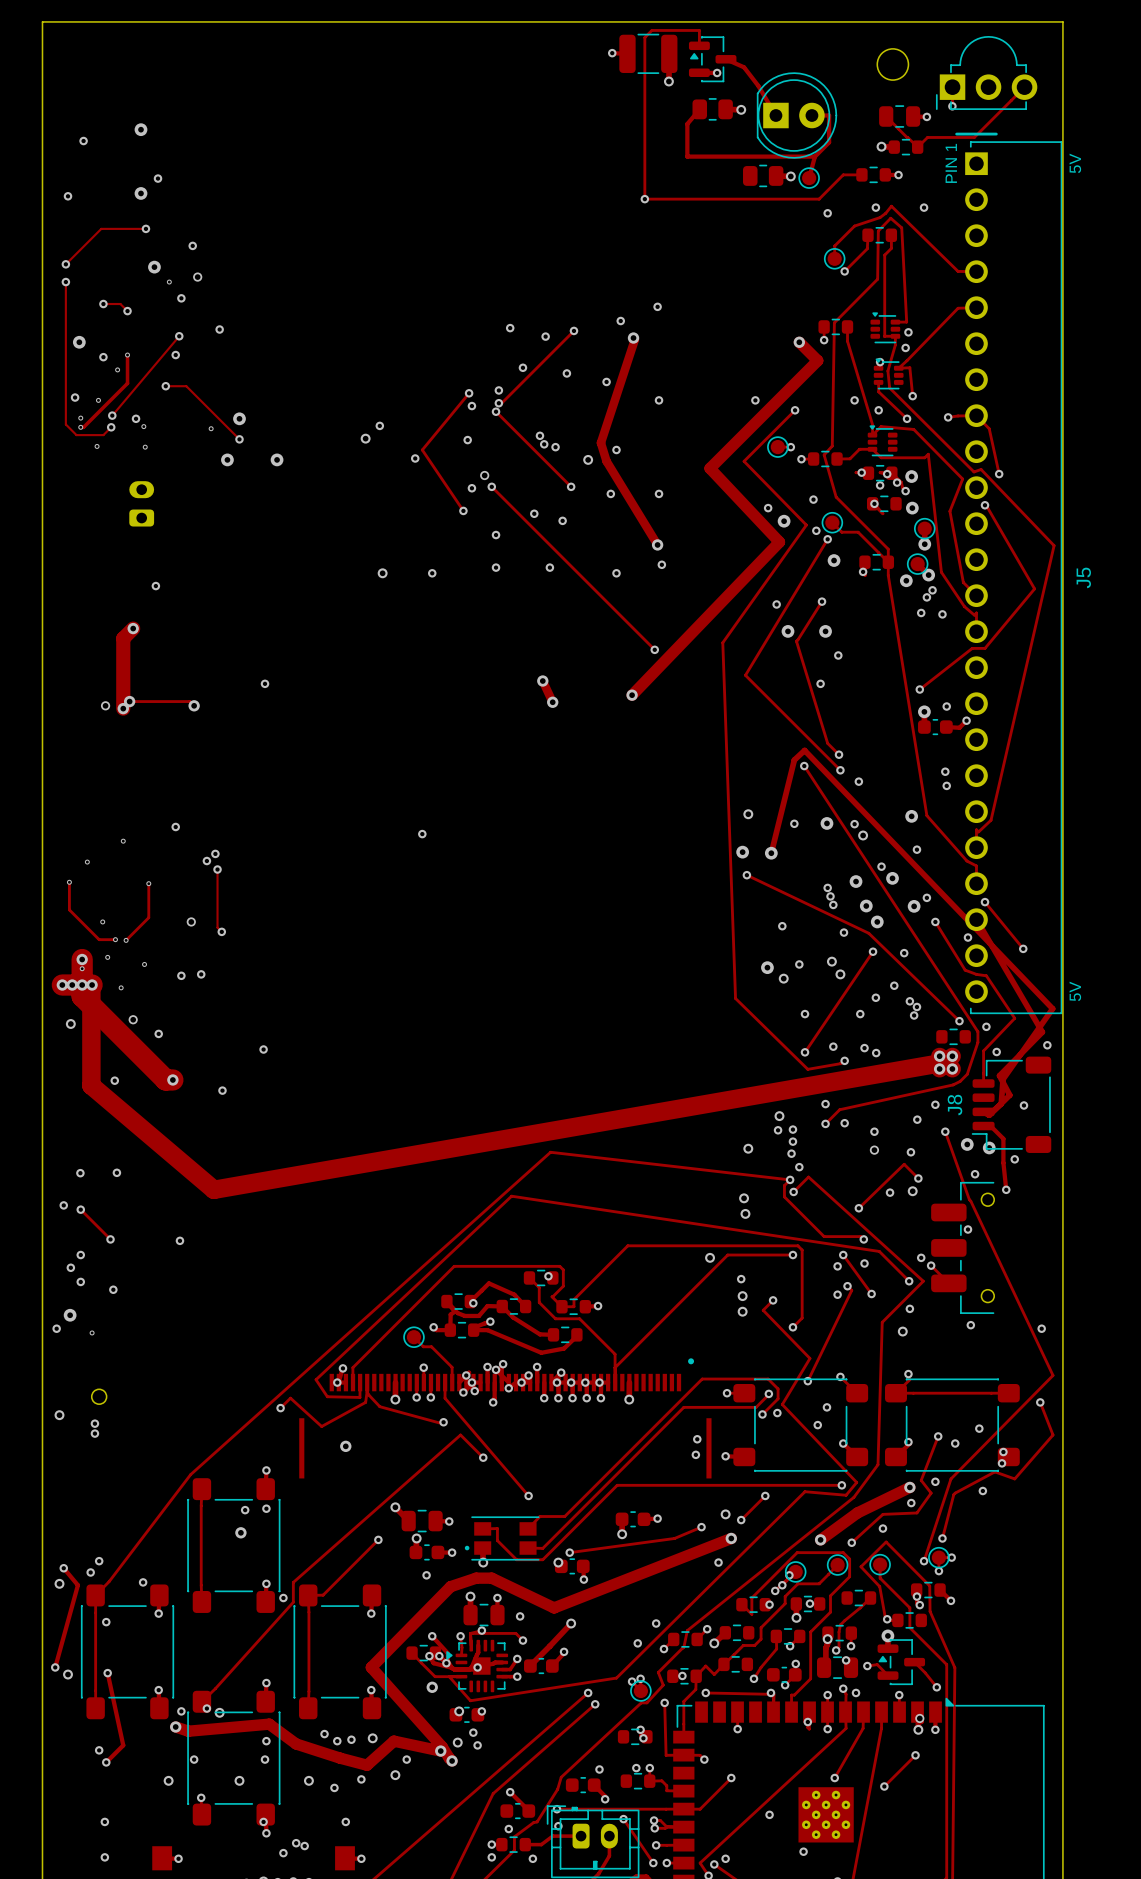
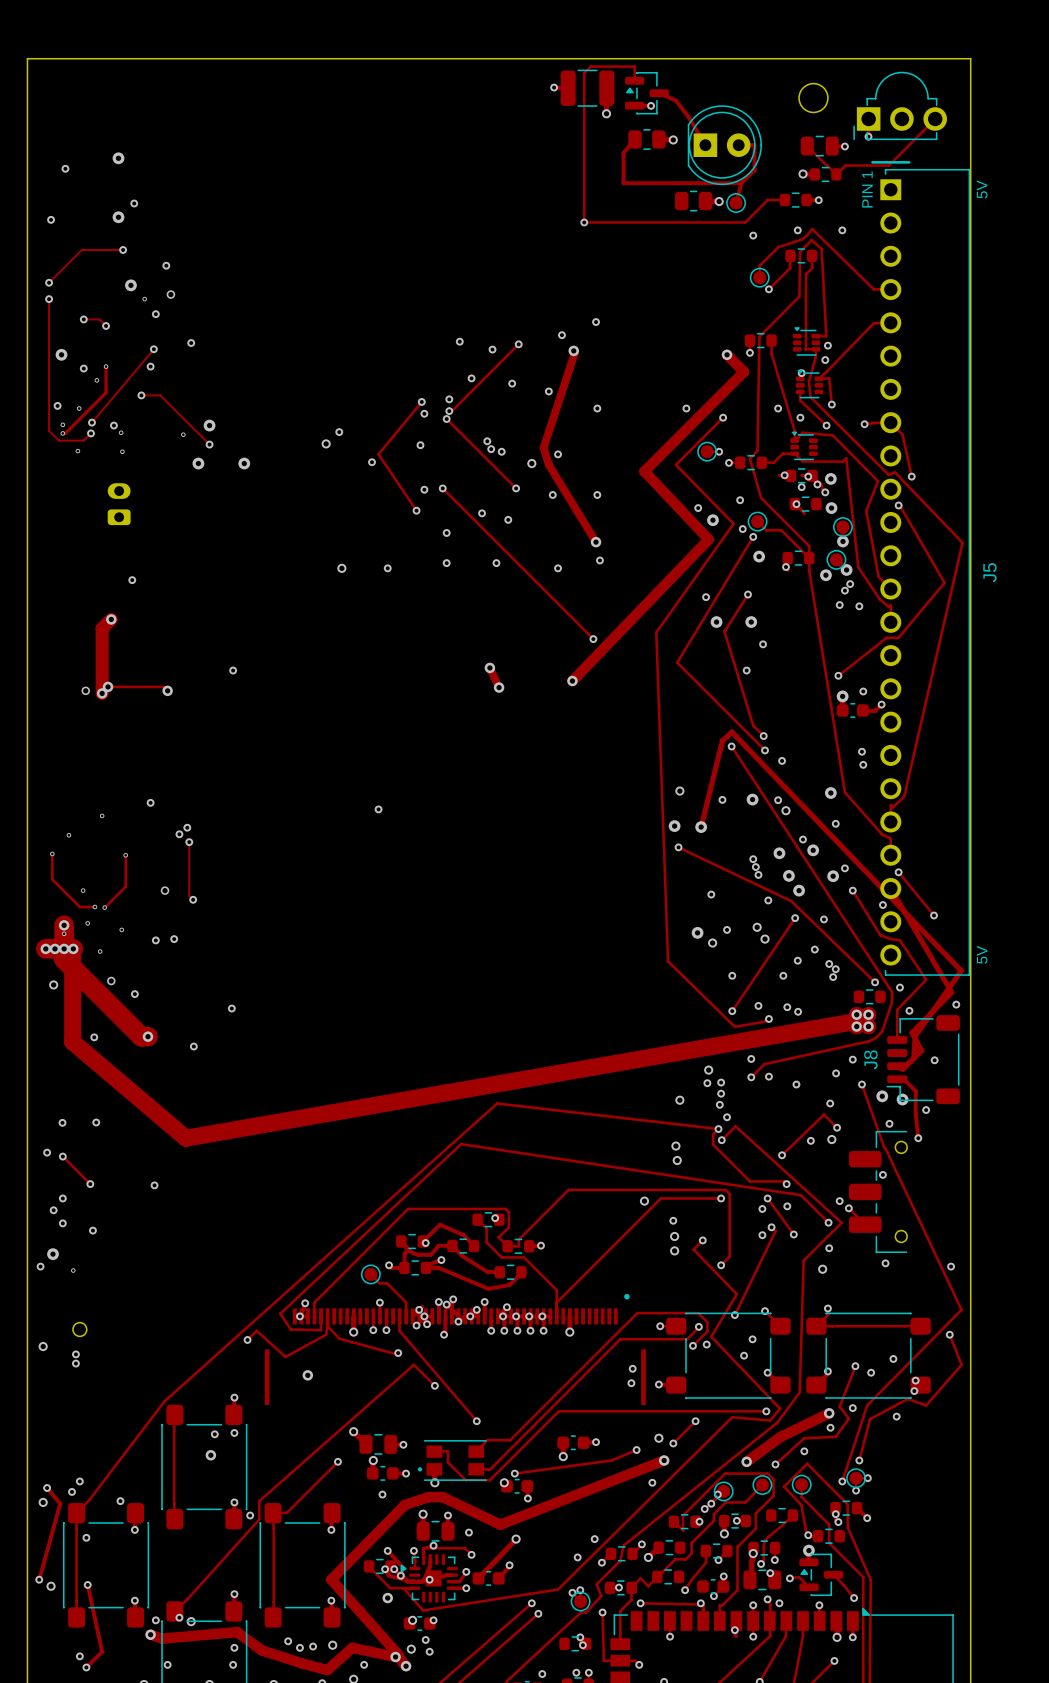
via: (484, 475) -> none
via: (874, 1150) -> none
via: (919, 1718) -> none

